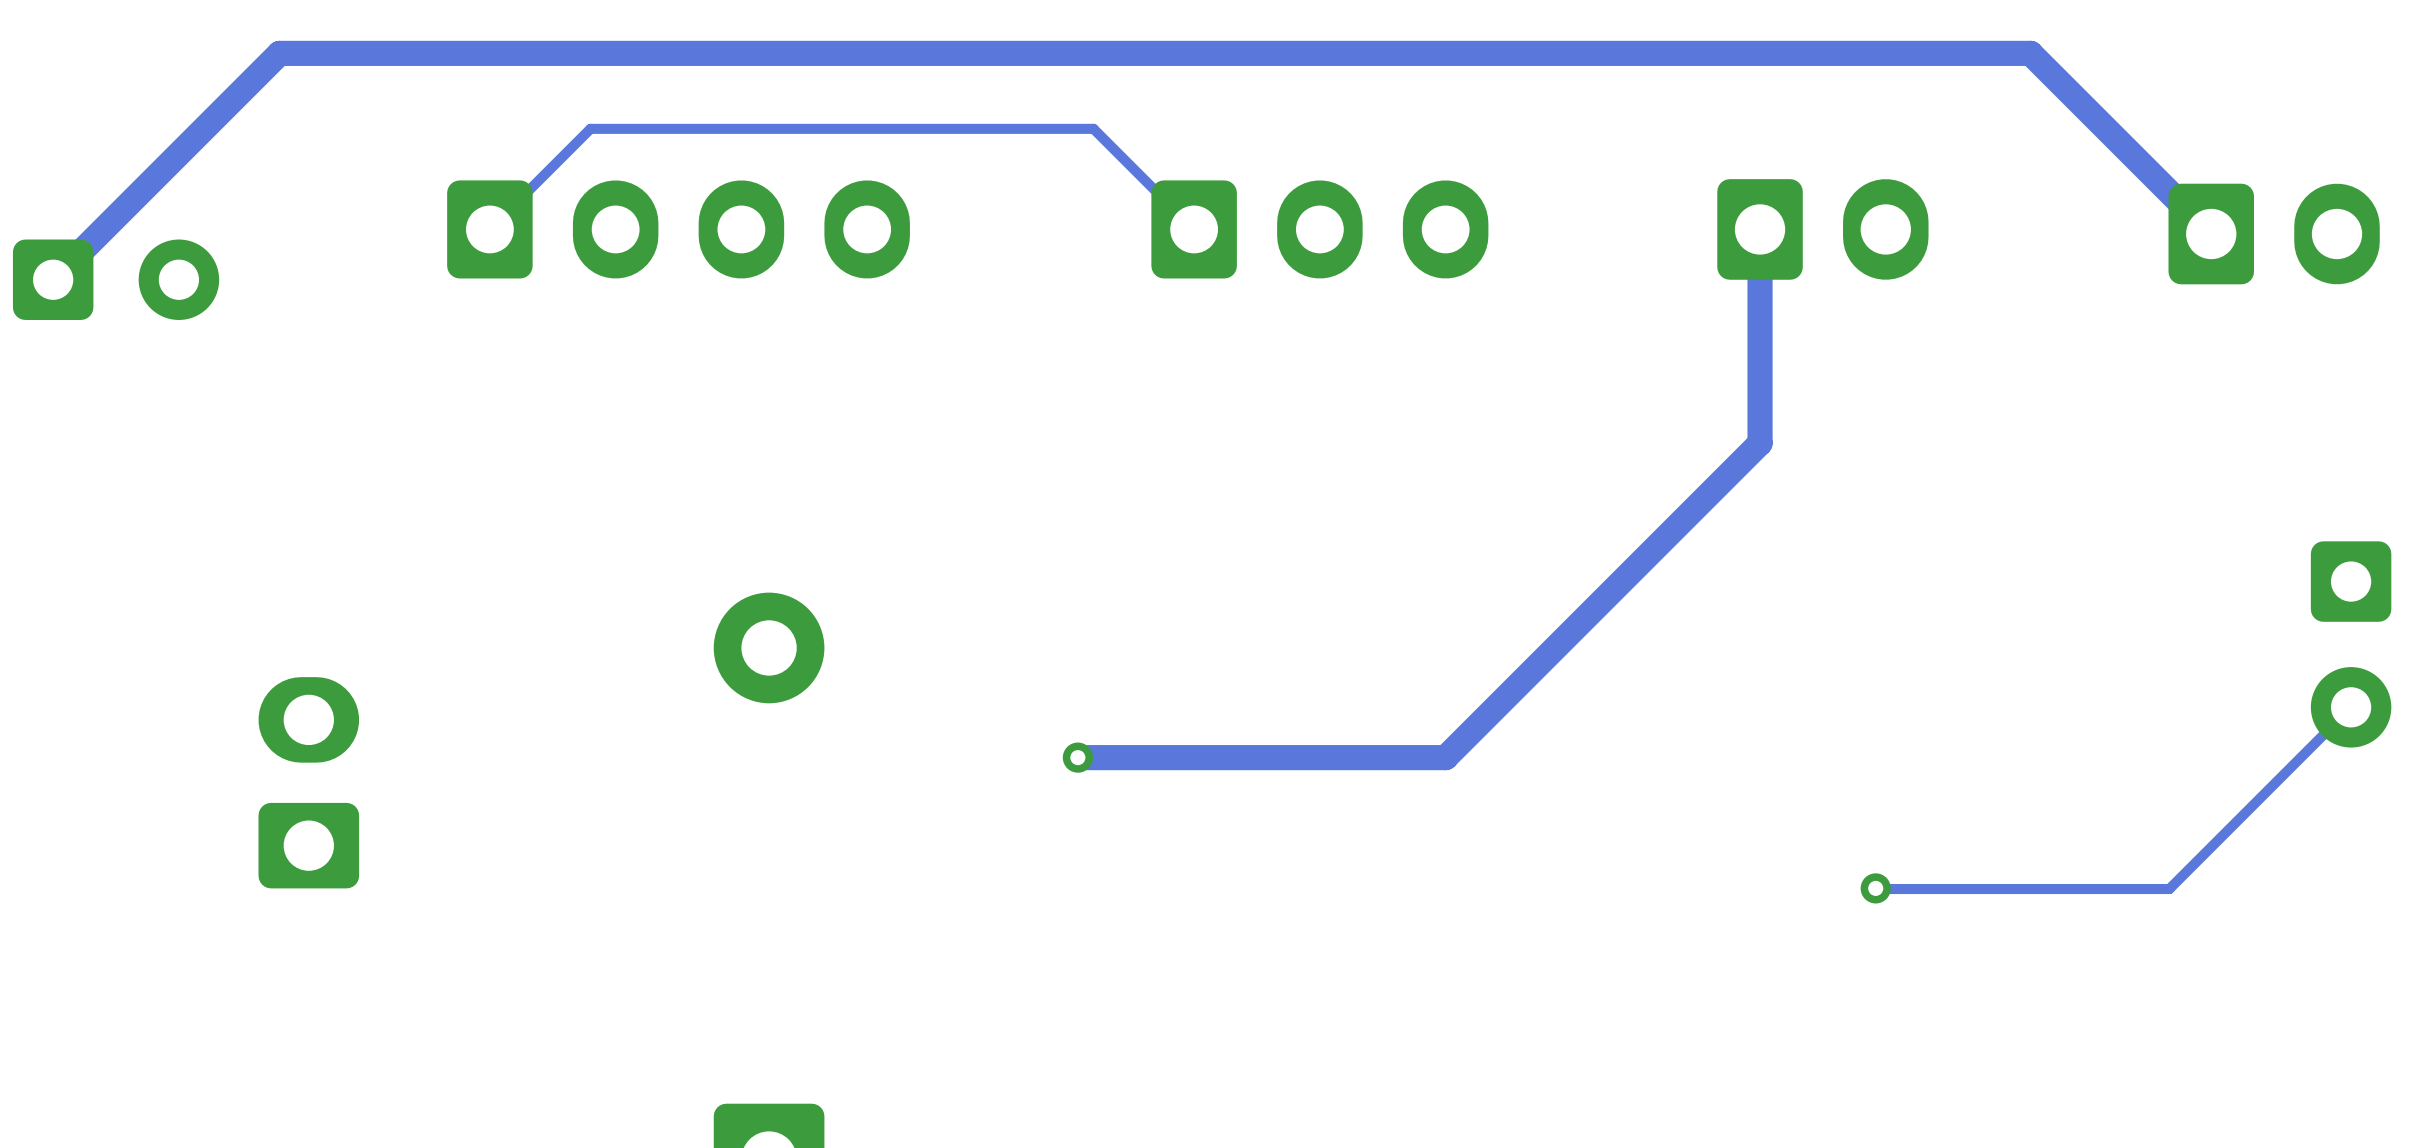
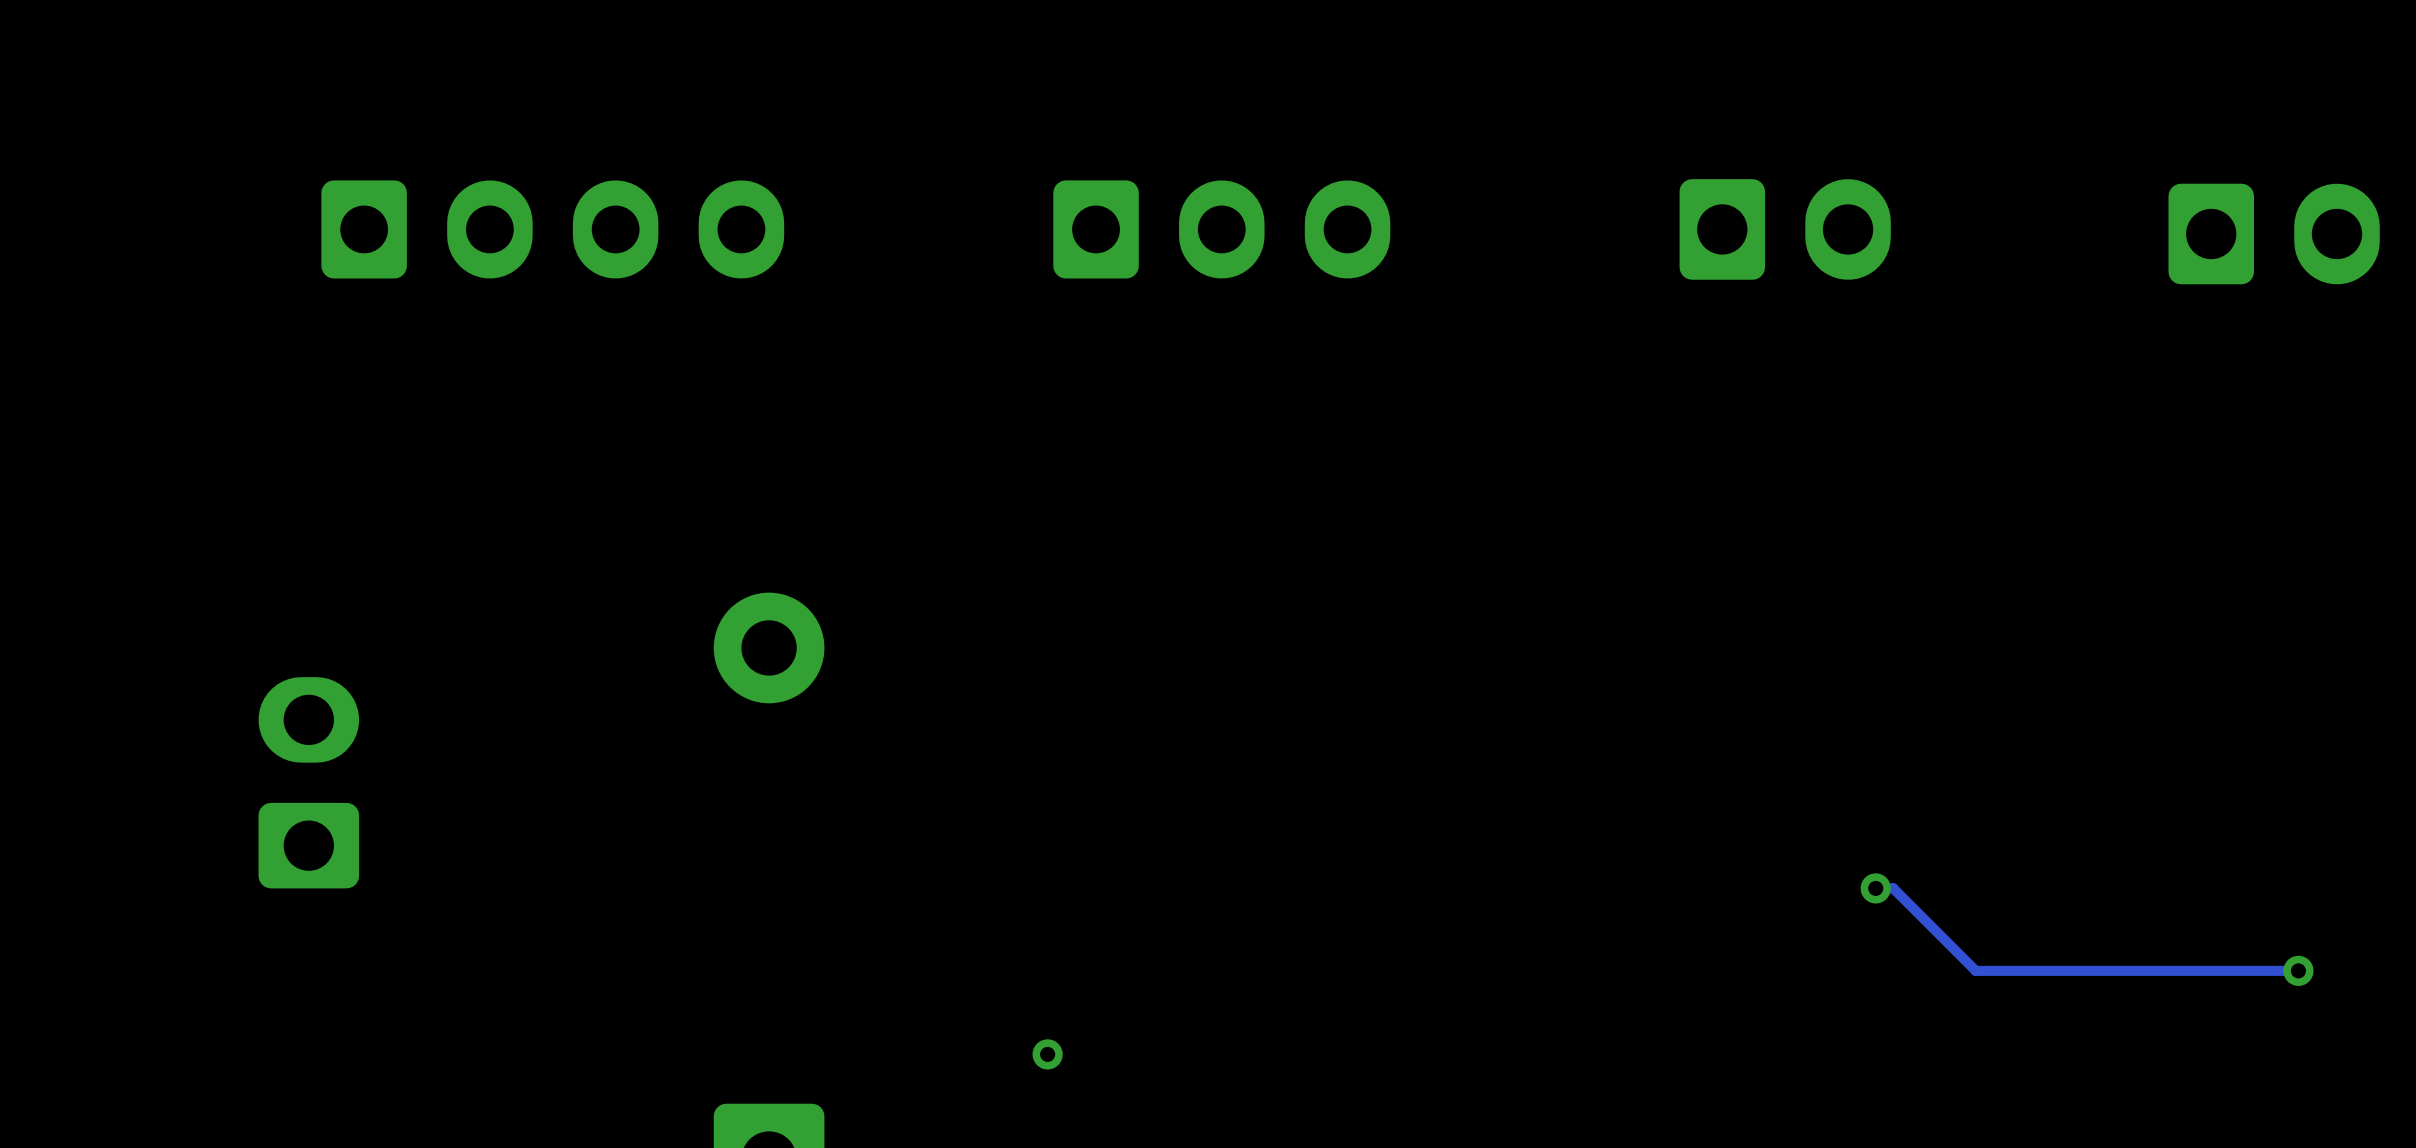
part position: (678, 229) -> (552, 229)
track: (1194, 229) (1093, 128) (590, 128) (489, 229) -> none
part position: (1319, 229) -> (1221, 229)
track: (1760, 229) (1760, 443) (1445, 757) (1076, 756) -> none
part position: (1822, 229) -> (1785, 229)
track: (2211, 234) (2030, 53) (279, 53) (53, 279) -> none
part: (116, 279) -> none
part: (2351, 644) -> none
track: (2351, 707) (2169, 889) (1876, 889) -> (2298, 970) (1975, 970) (1893, 888) (1875, 888)
via position: (1077, 757) -> (1047, 1054)
via: none -> (2298, 970)

